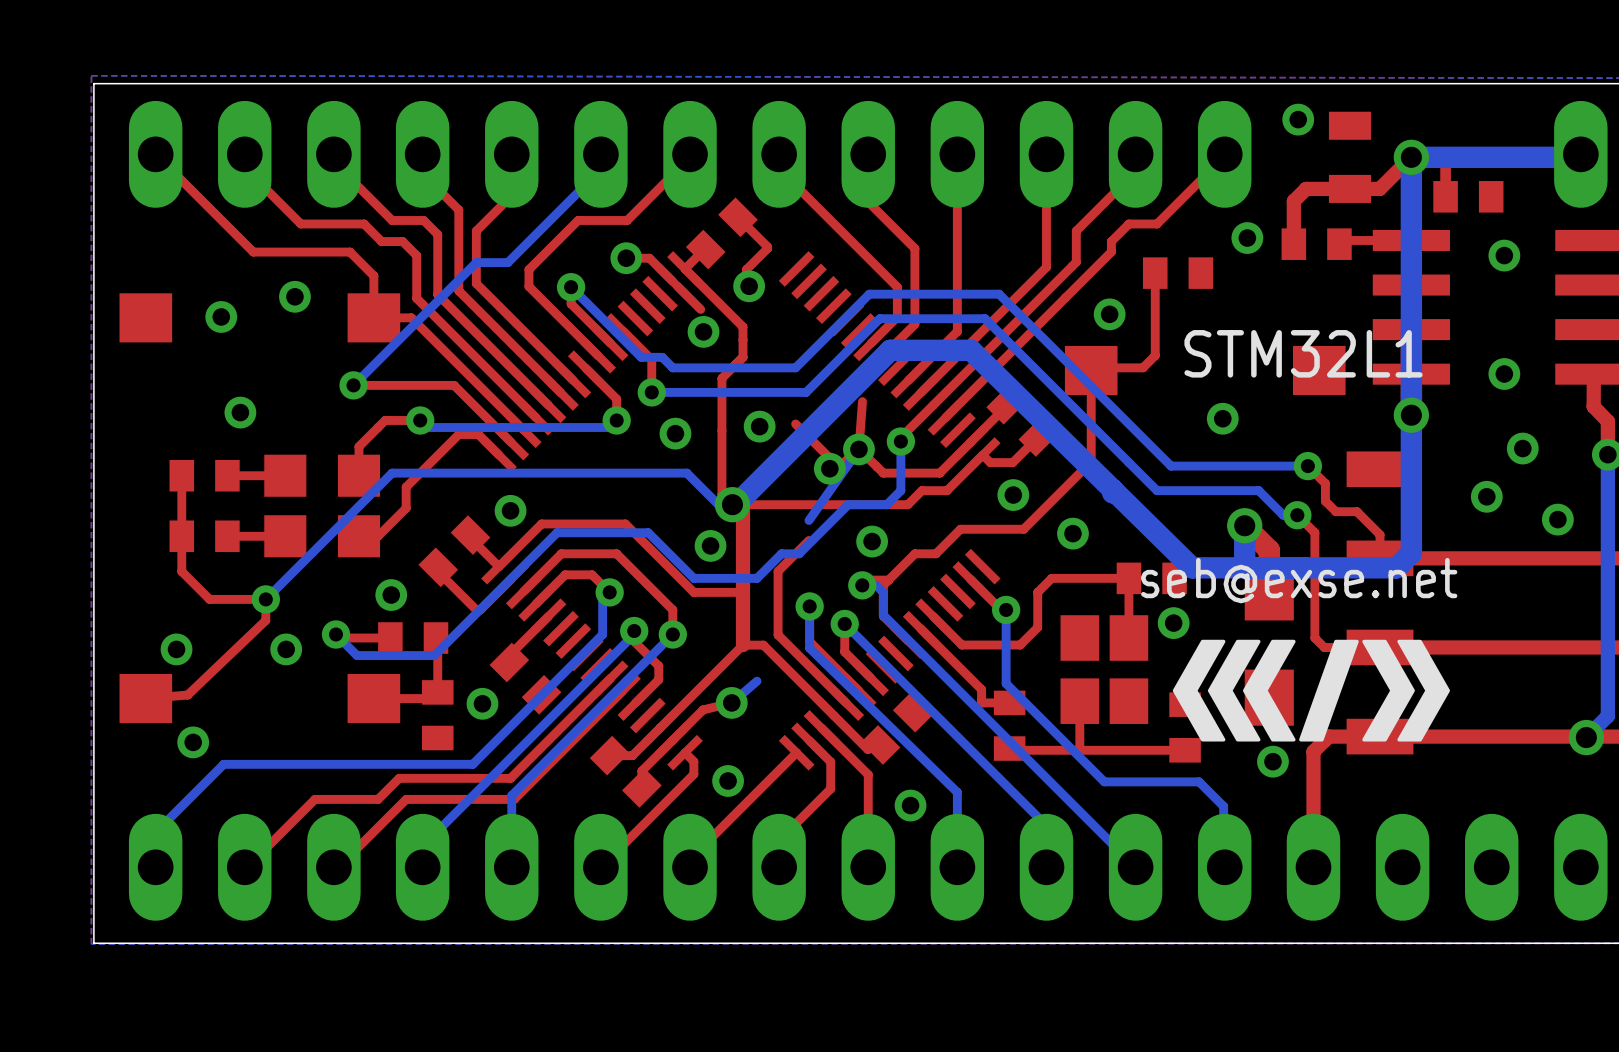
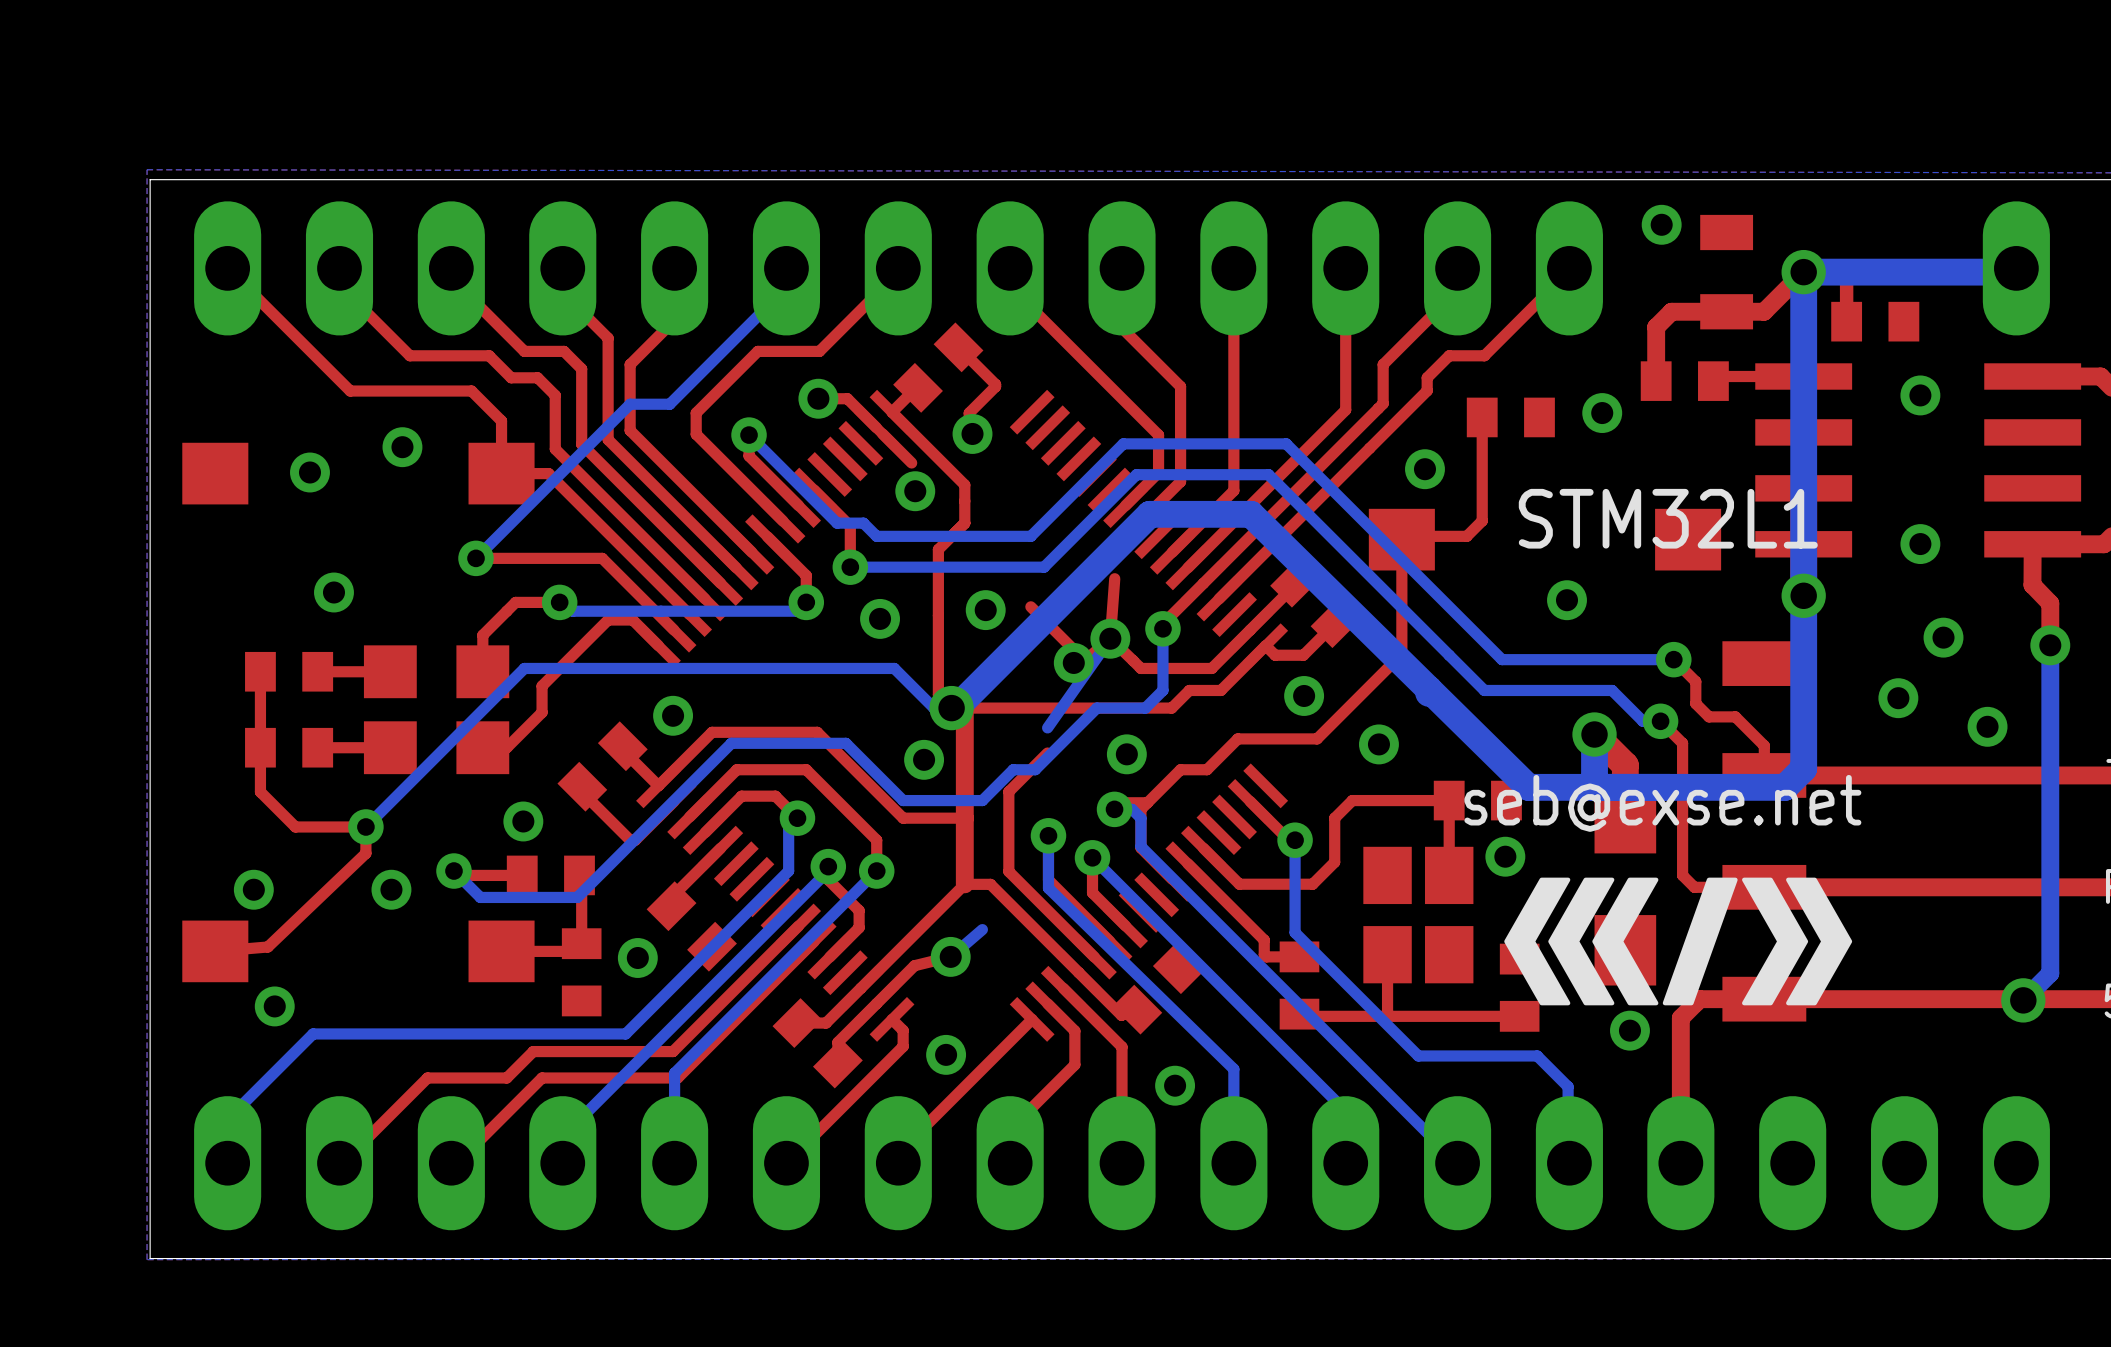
via position: (1247, 238) -> (1602, 413)

